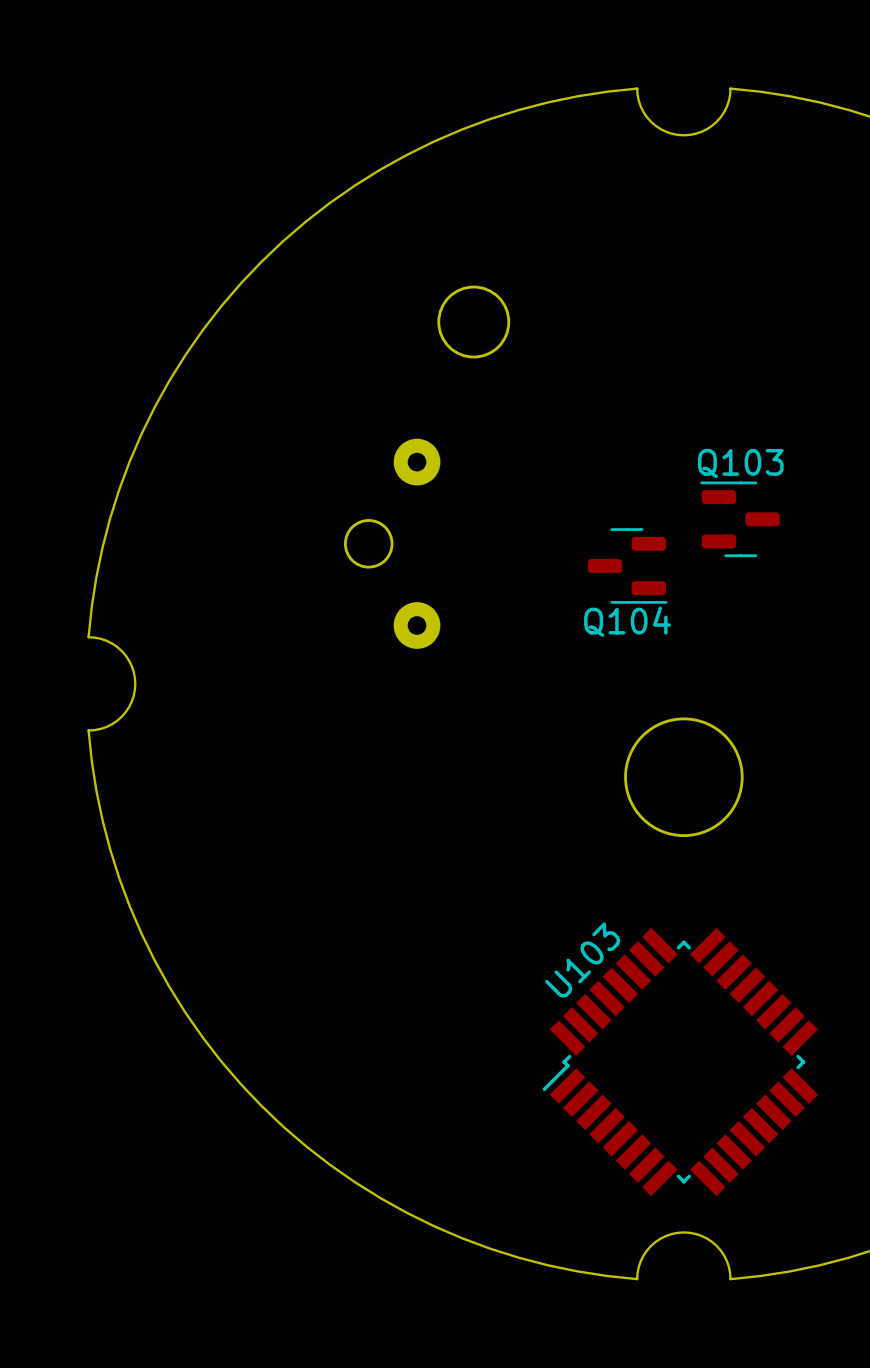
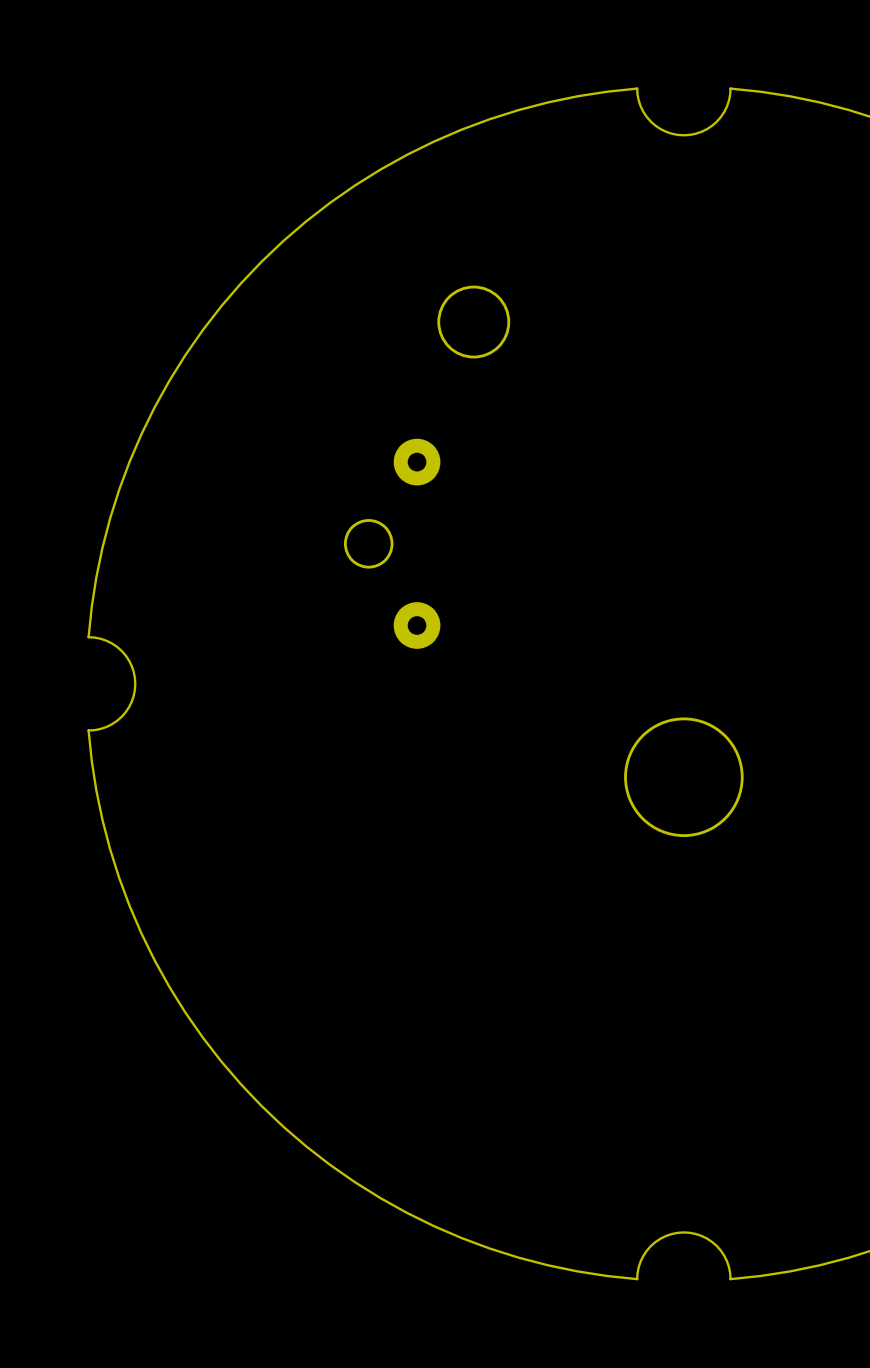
Q103: (740, 519) -> none
Q104: (627, 565) -> none
U103: (680, 1062) -> none

